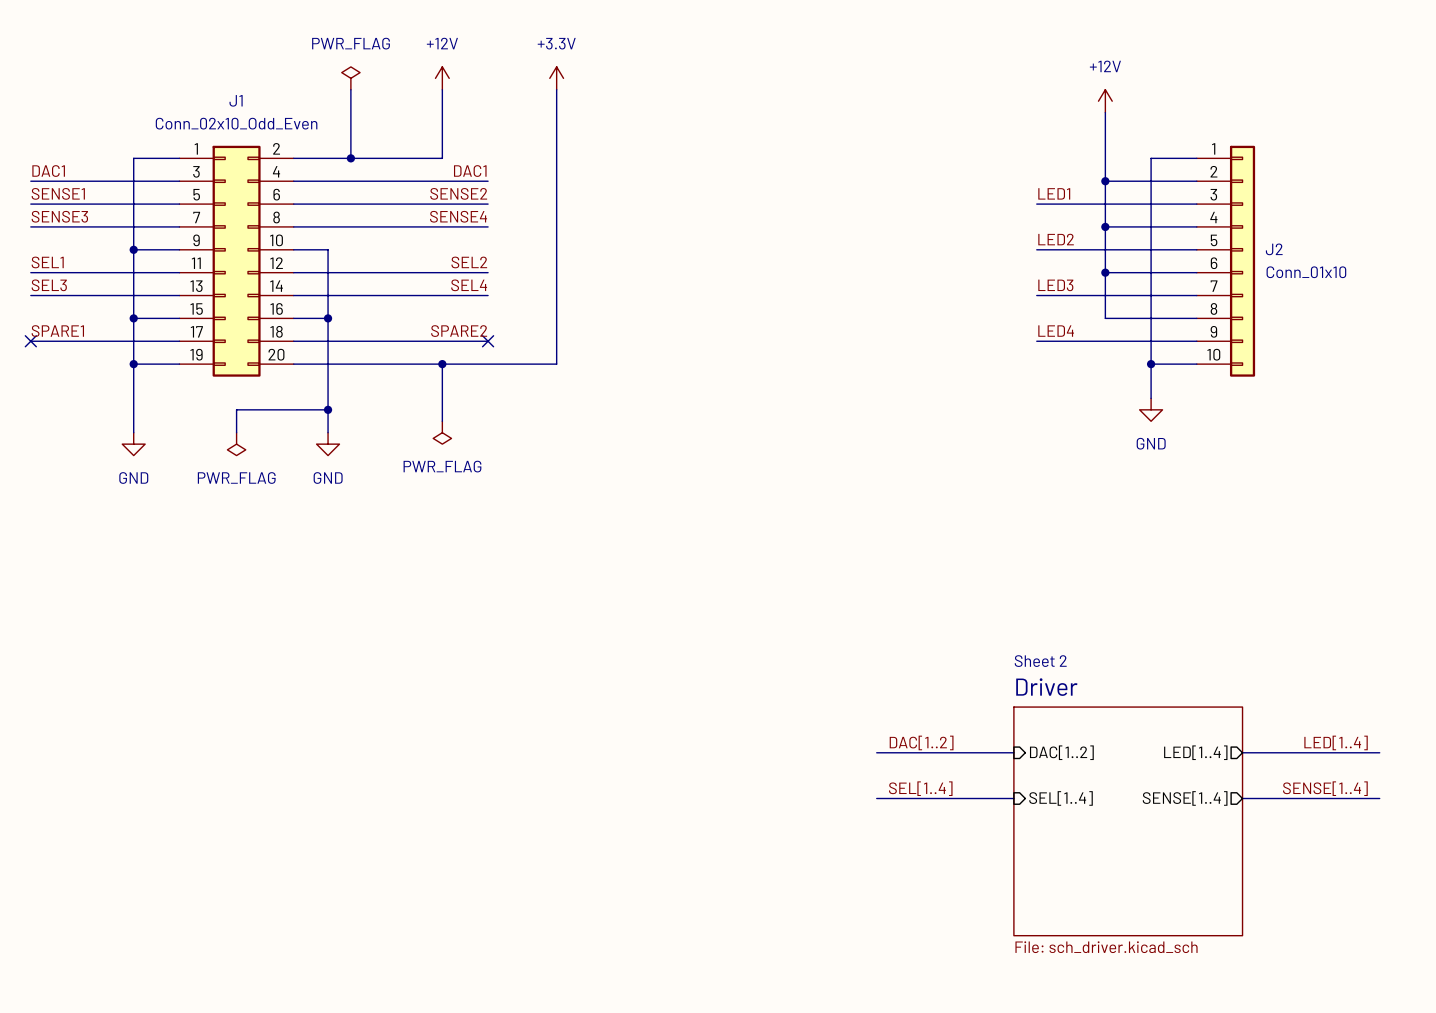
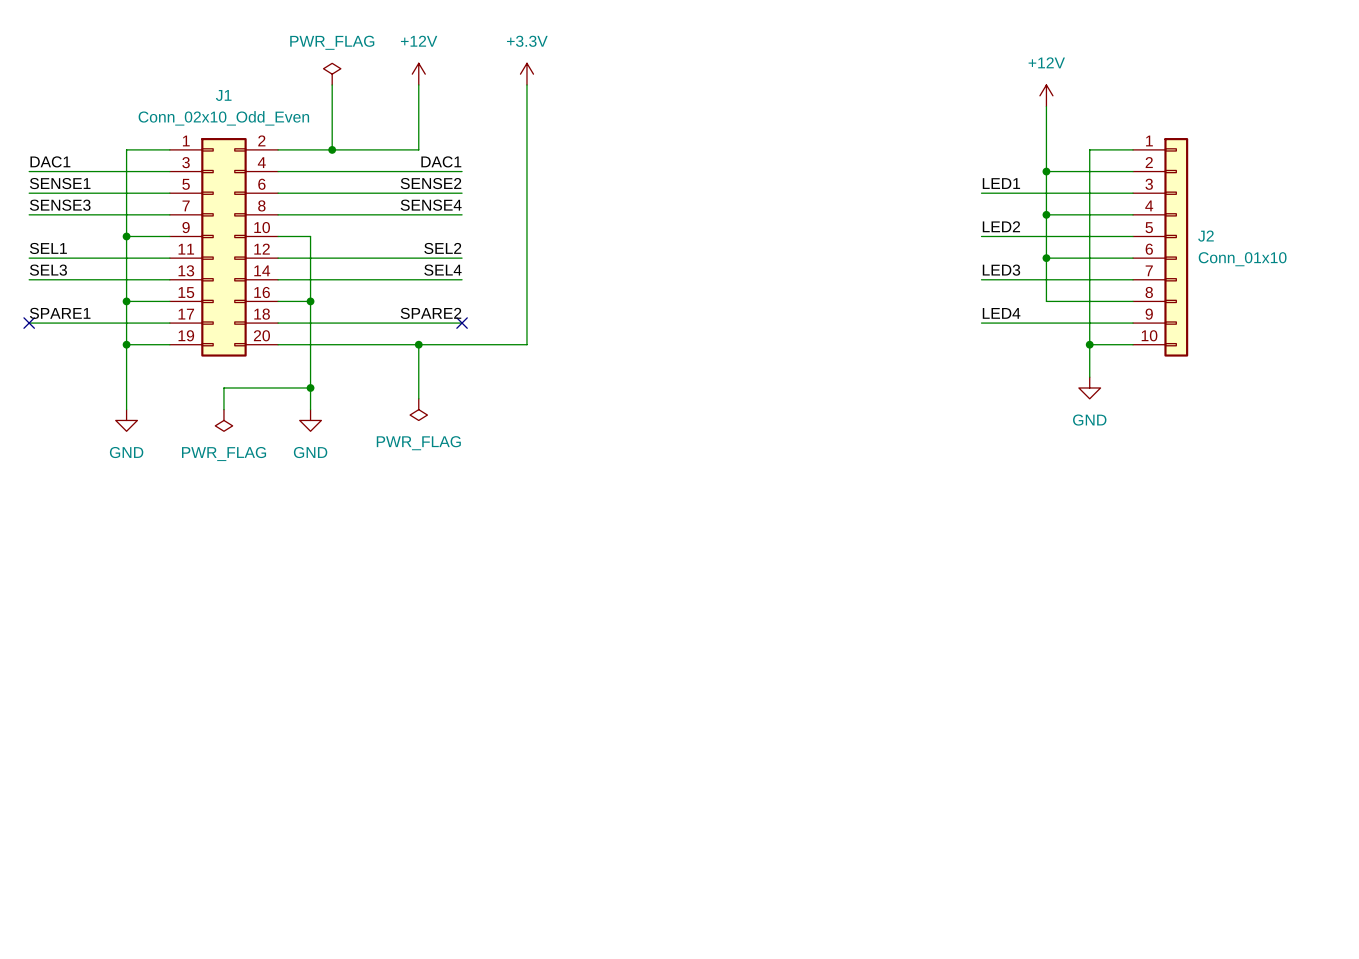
label: DAC[1..2] (921, 742) -> none
label: LED[1..4] (1336, 742) -> none
bus: (876, 752) (1013, 752) -> none
sheet pin: DAC[1..2] (1061, 752) -> none
sheet pin: LED[1..4] (1195, 752) -> none
bus: (1242, 752) (1379, 752) -> none
label: SEL[1..4] (920, 788) -> none
label: SENSE[1..4] (1325, 788) -> none
bus: (876, 798) (1013, 798) -> none
sheet pin: SEL[1..4] (1061, 798) -> none
sheet pin: SENSE[1..4] (1185, 798) -> none
bus: (1242, 798) (1379, 798) -> none
sheet Driver: File: sch_driver.kicad_sch (1128, 821) -> none

